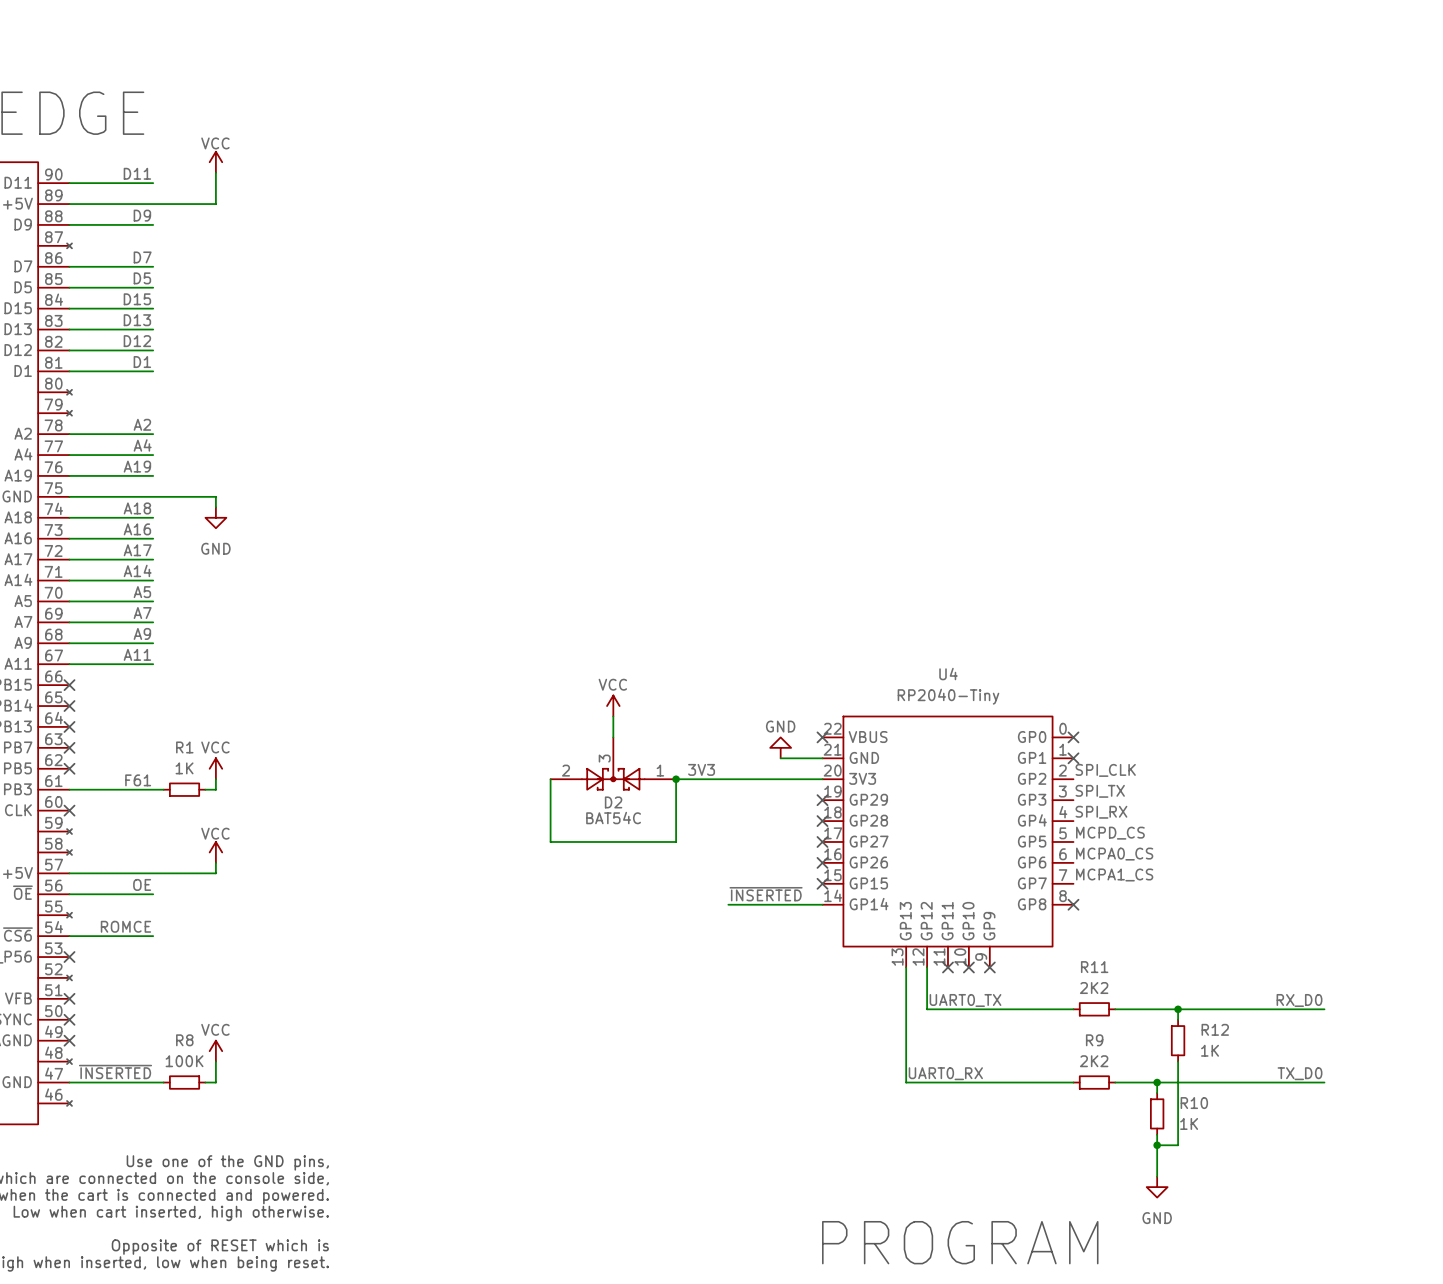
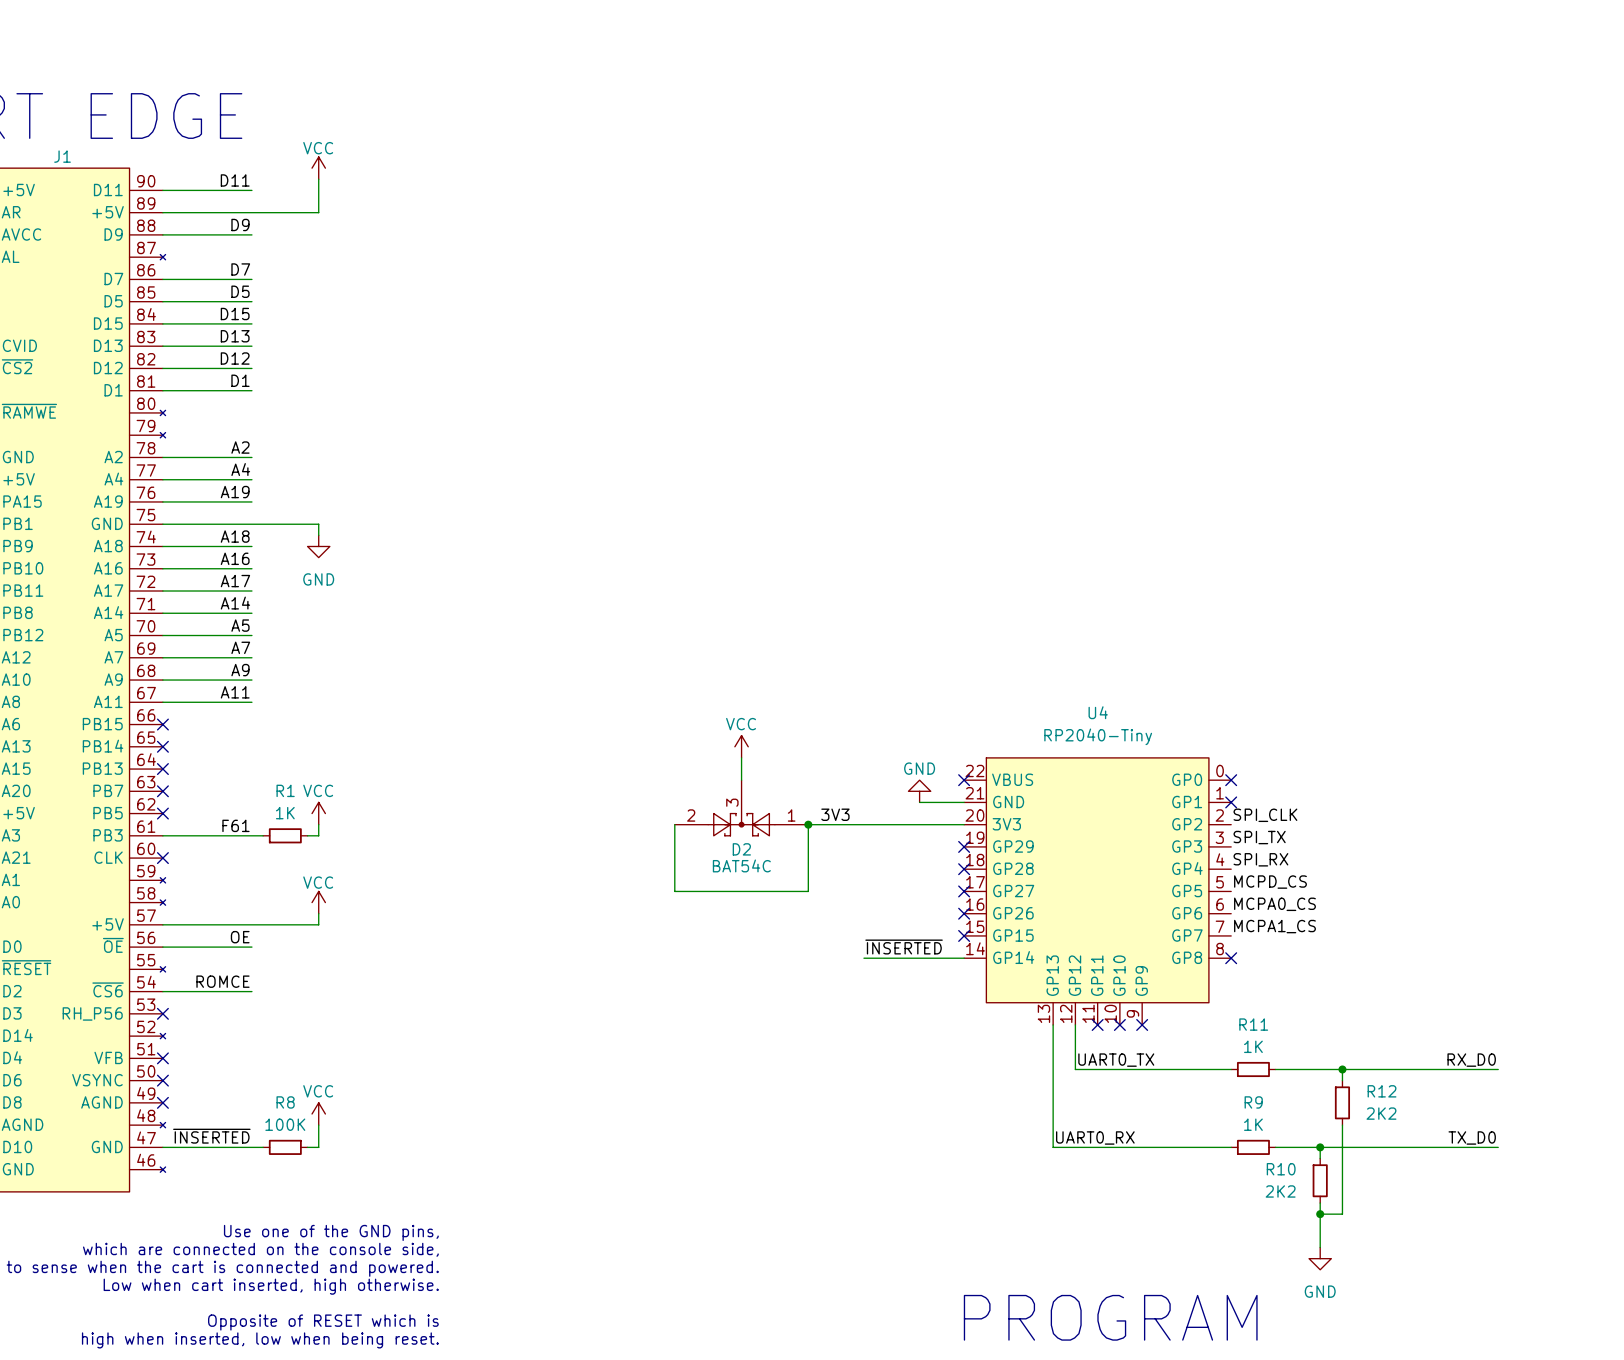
R11 value: 2K2 (1094, 988) -> 1K (1253, 1046)
R12 value: 1K (1210, 1050) -> 2K2 (1381, 1113)
R9 value: 2K2 (1094, 1061) -> 1K (1253, 1124)
R10 name position: R10 (1194, 1103) -> R10 (1281, 1169)
R10 value: 1K (1189, 1123) -> 2K2 (1280, 1191)

